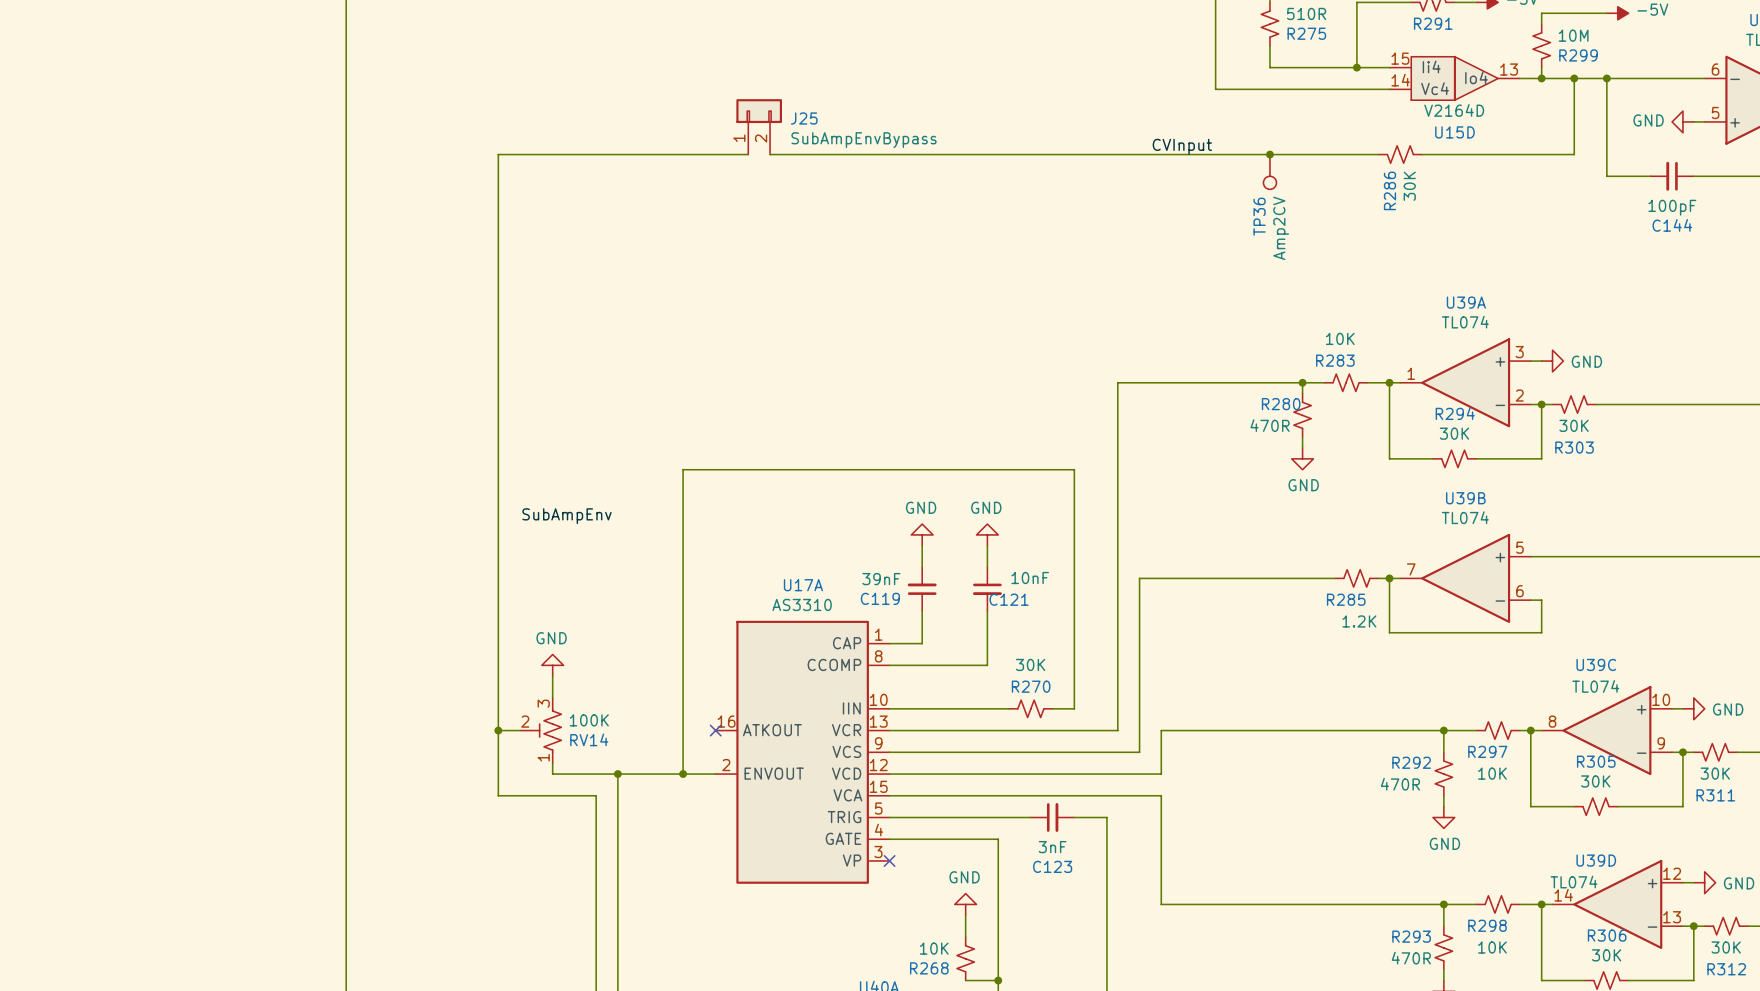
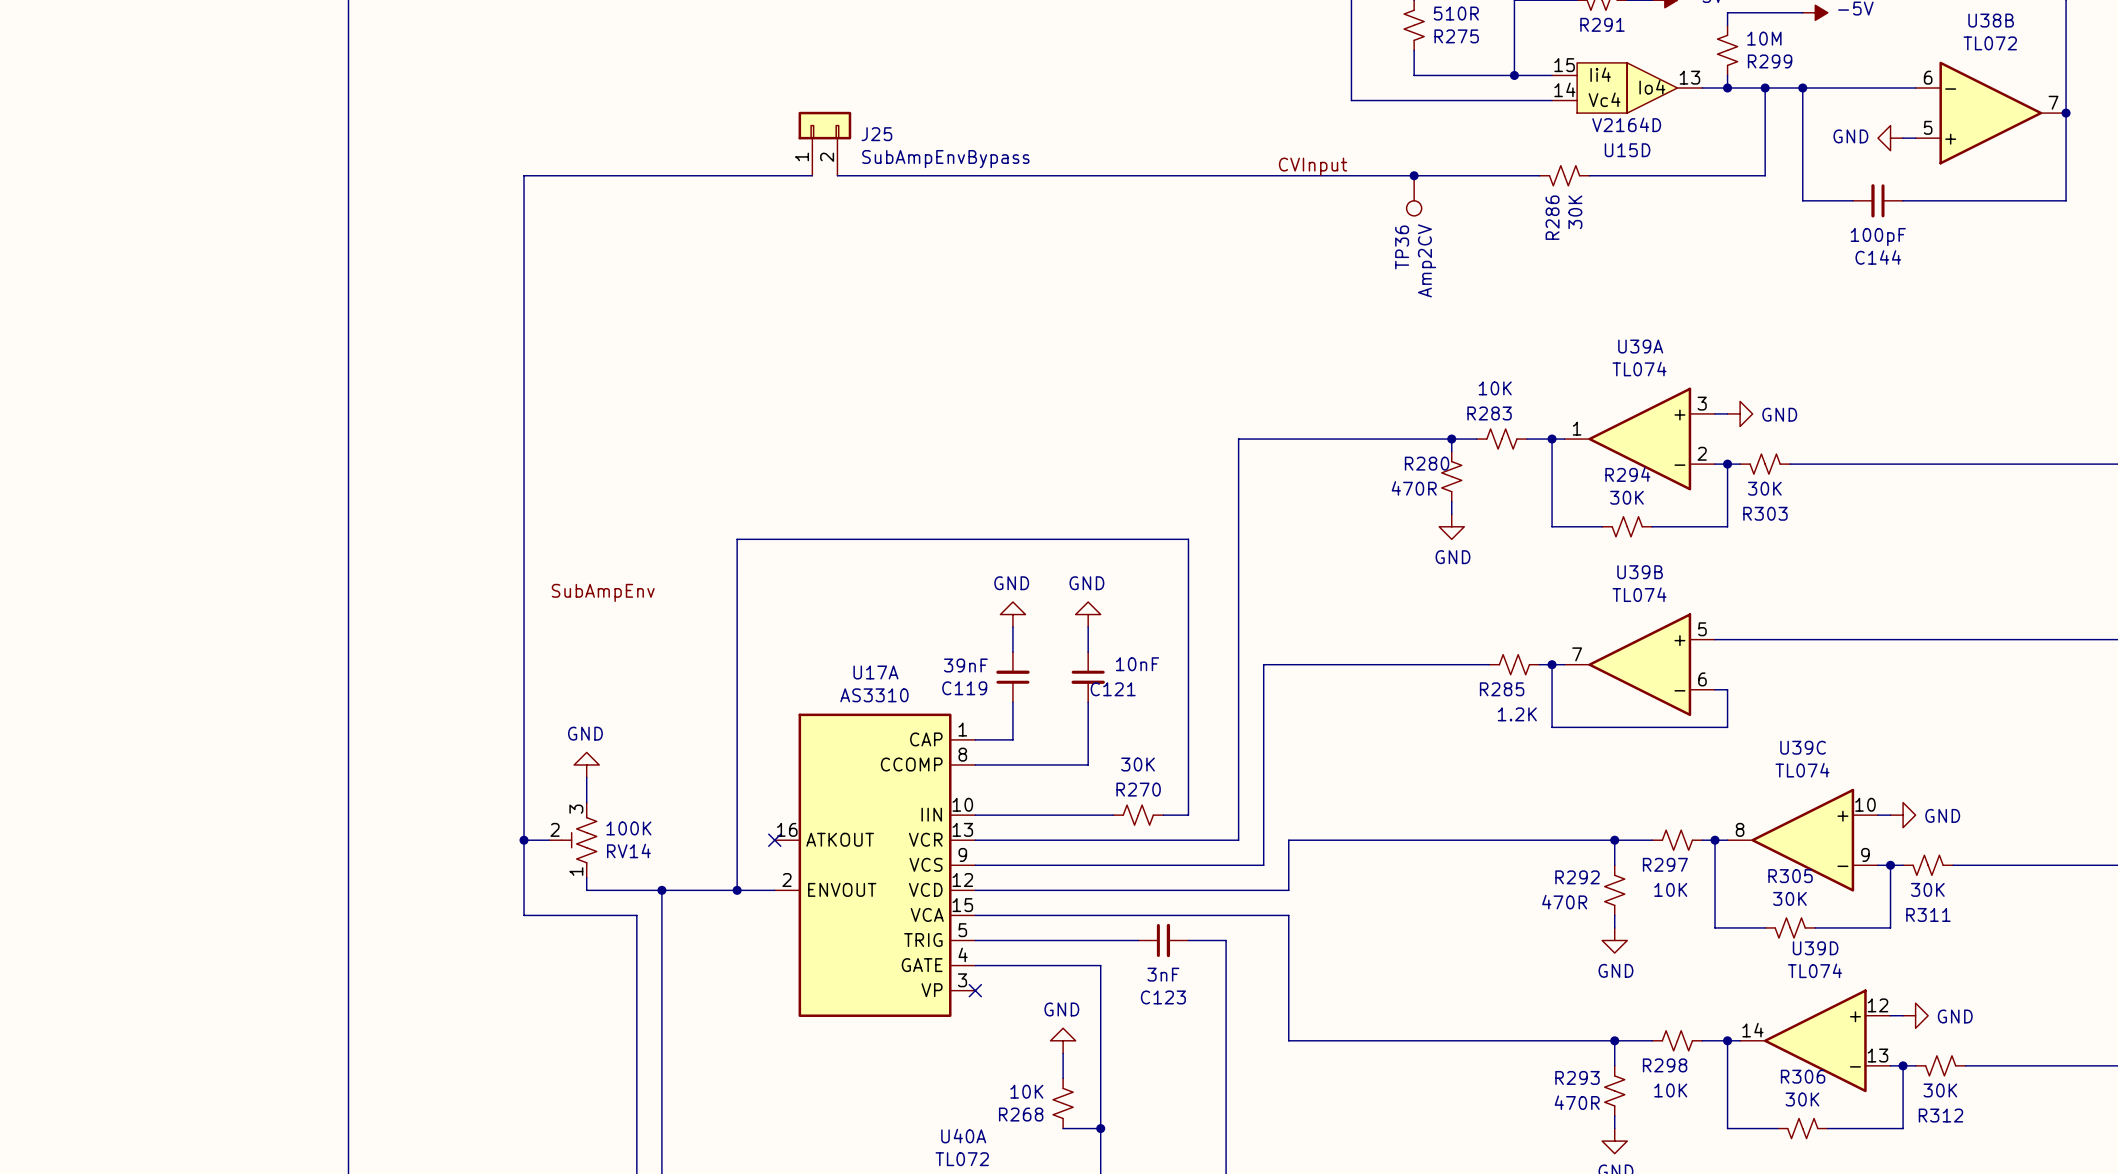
U39C name position: U39C (1596, 664) -> U39C (1803, 747)
U39C value position: TL074 (1595, 686) -> TL074 (1802, 770)
U39D name position: U39D (1596, 860) -> U39D (1815, 948)
U39D value position: TL074 (1574, 882) -> TL074 (1815, 970)

